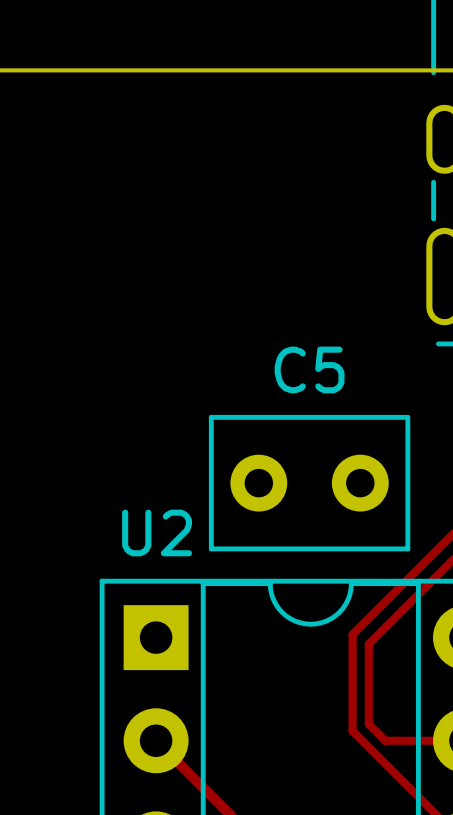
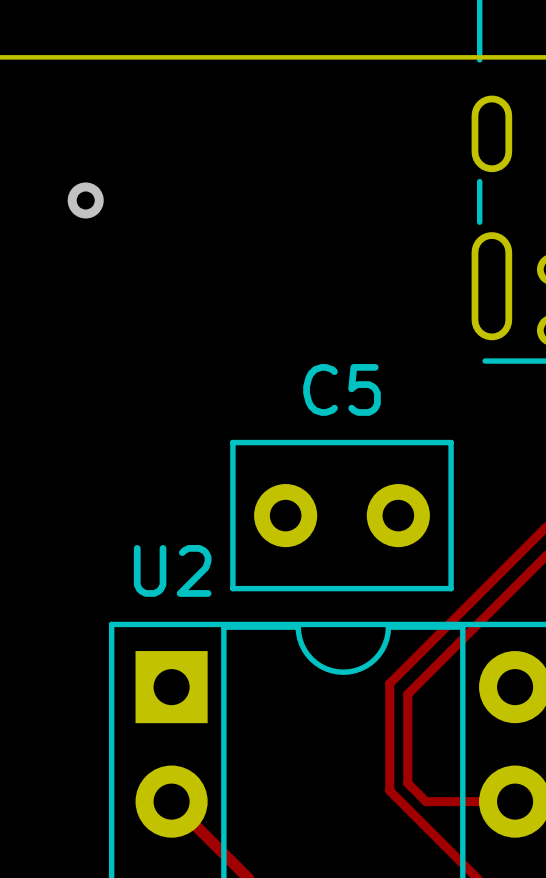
via: none -> (85, 200)

